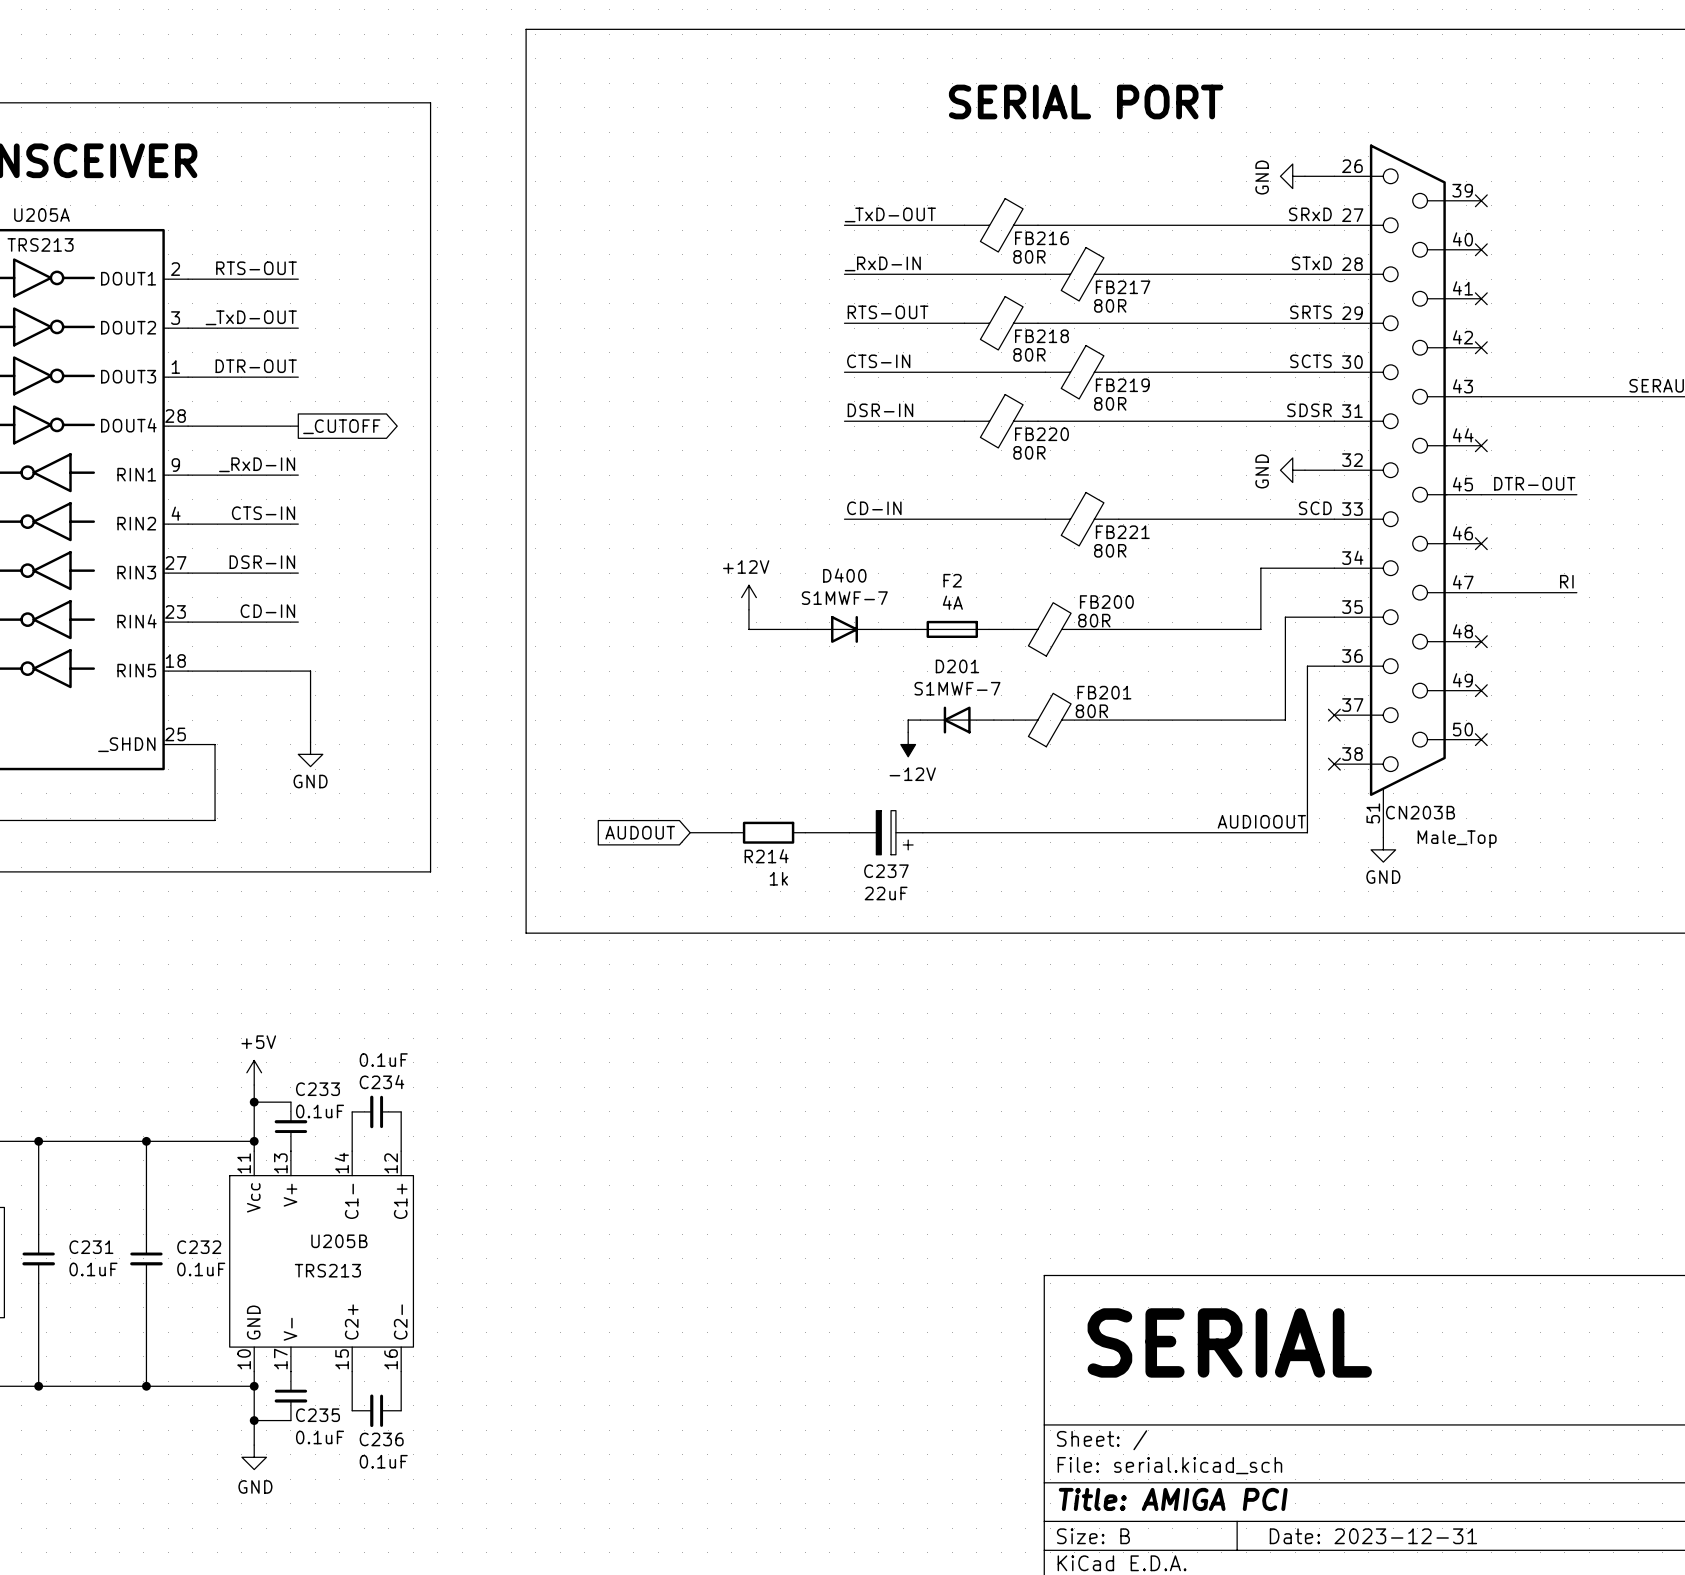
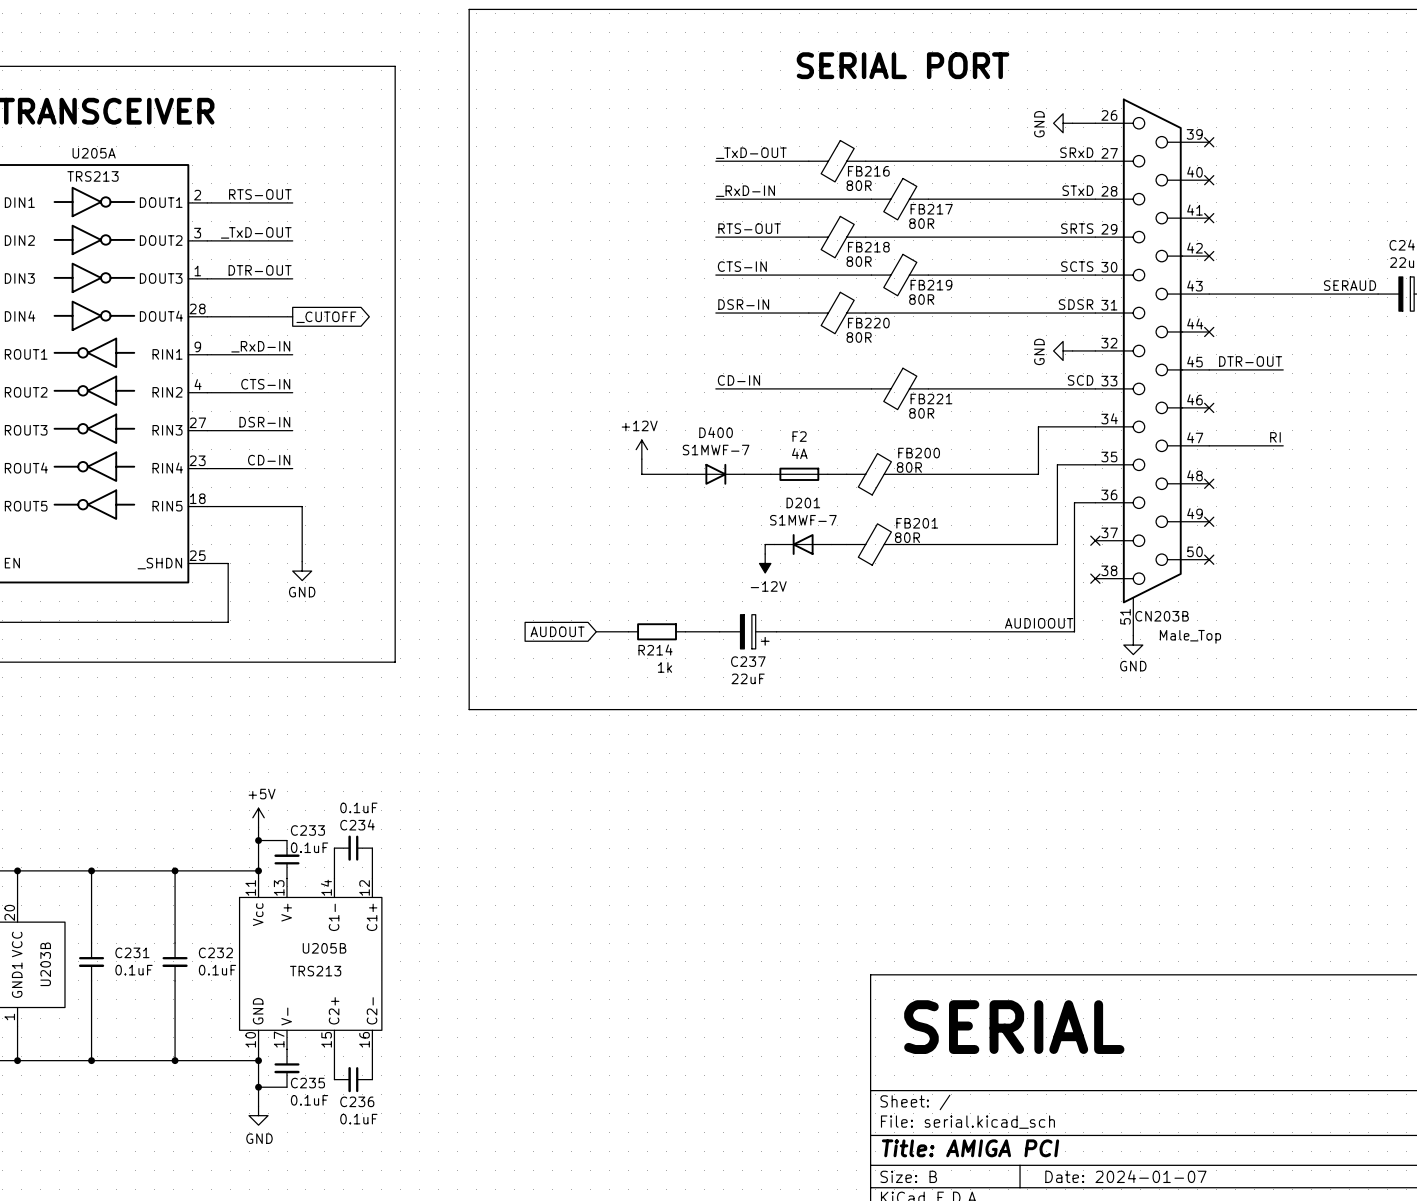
title block: Date: 2023-12-31 (1373, 1536) -> Date: 2024-01-07 (1125, 1176)

